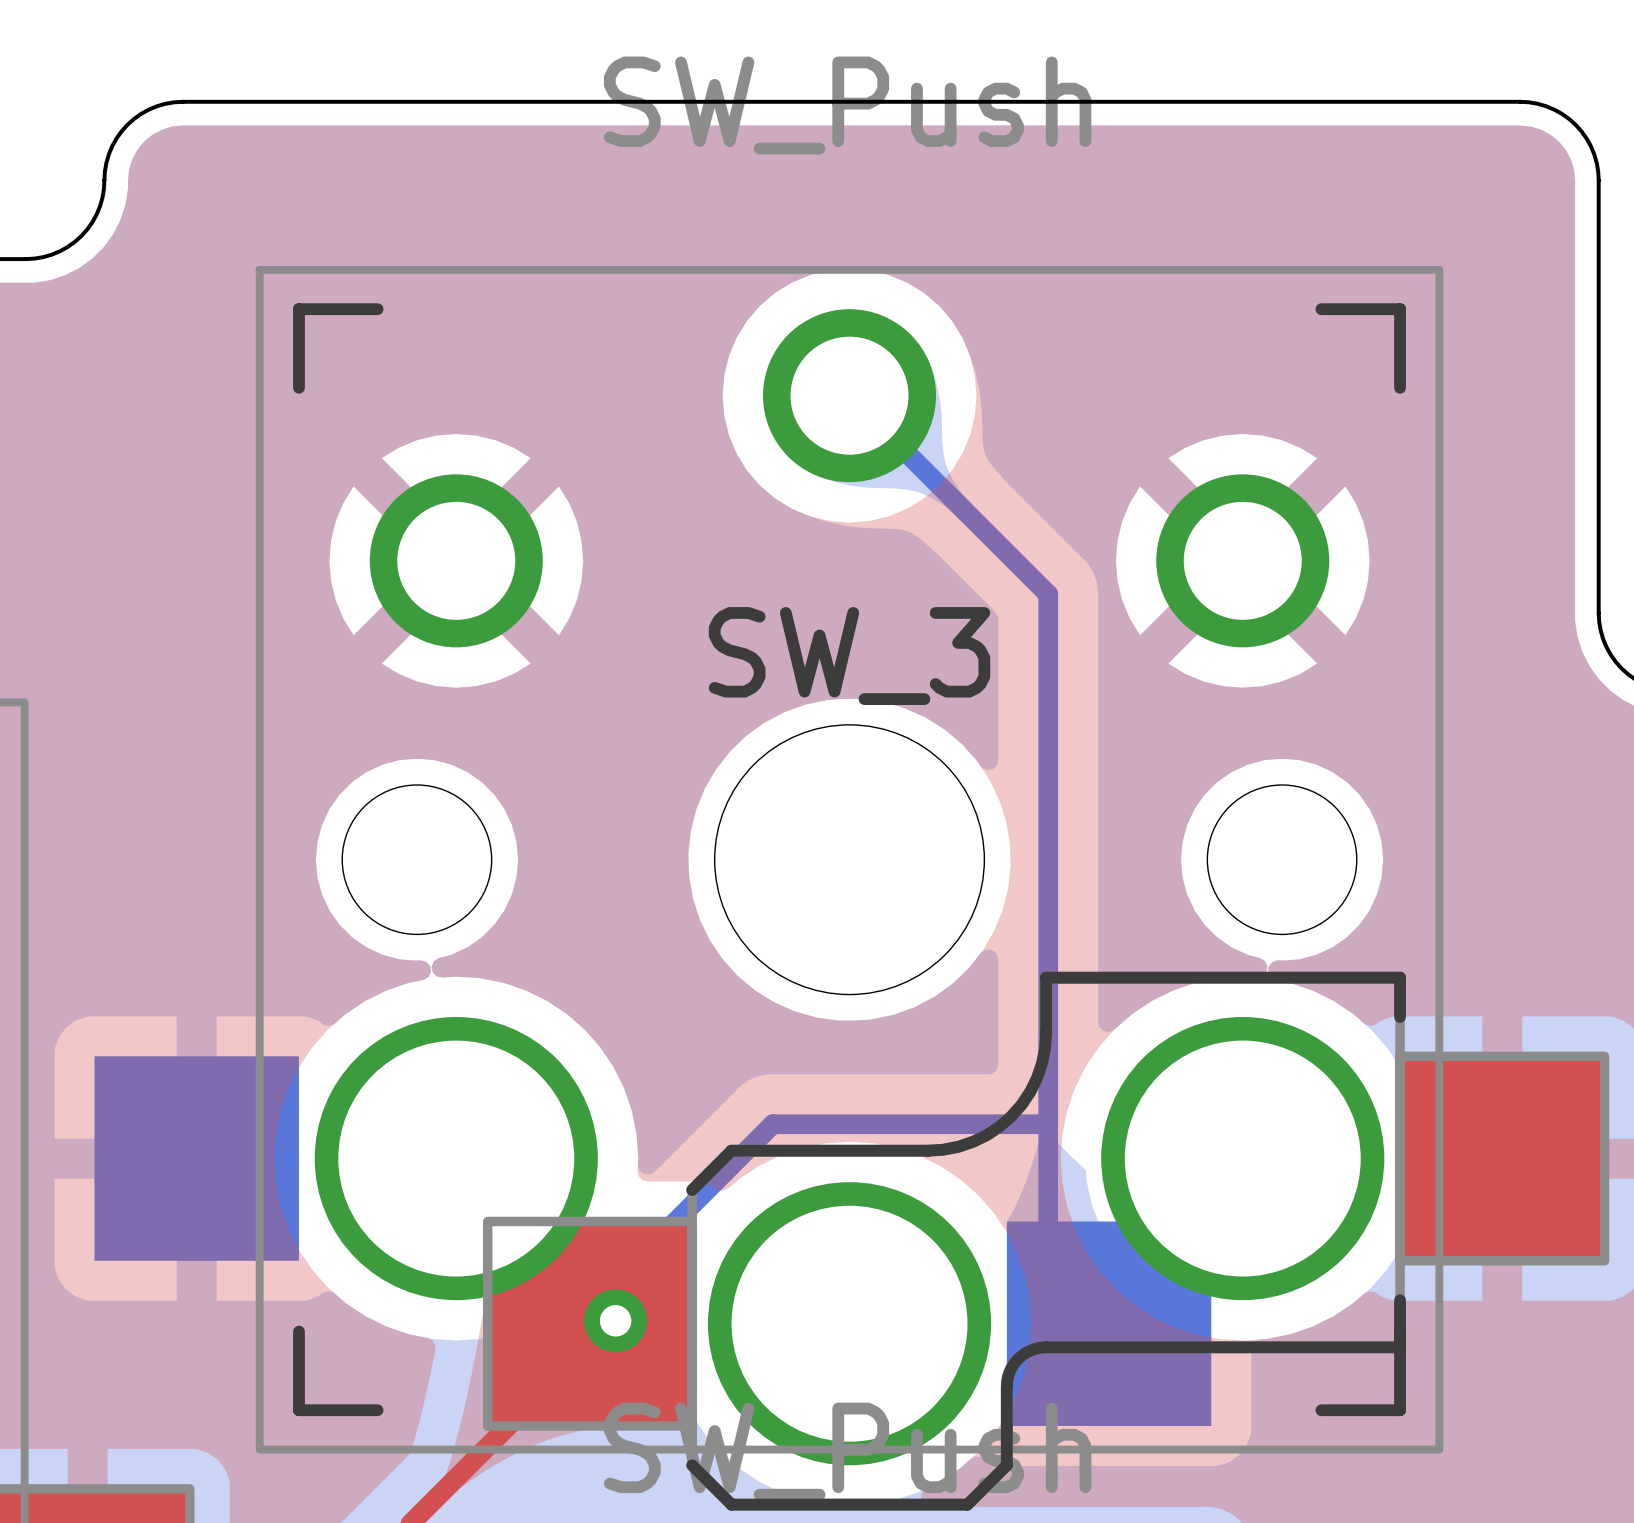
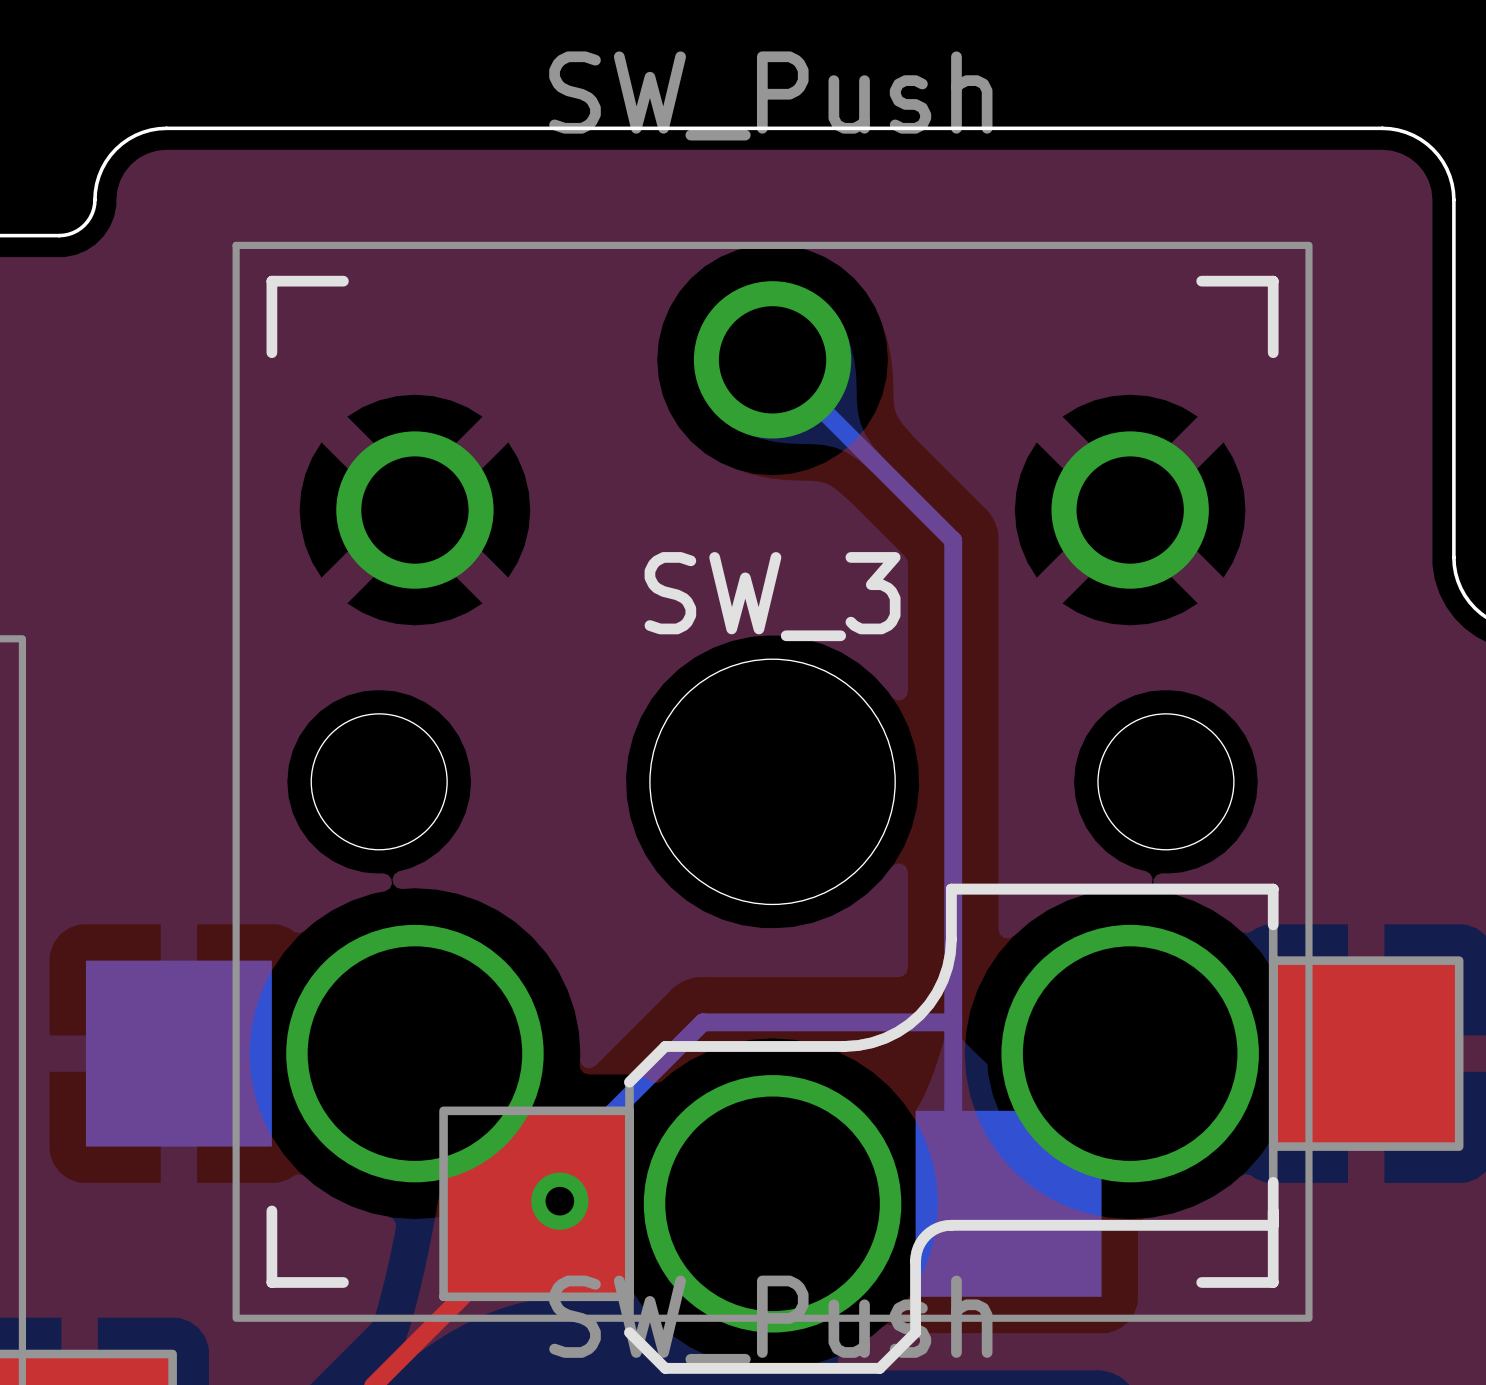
board edge: (1598, 219) (1598, 171) (1594, 154) (1586, 138) (1575, 124) (1561, 113) (1546, 106) (1528, 102) (183, 101) (157, 106) (141, 113) (127, 124) (116, 138) (108, 154) (102, 197) (96, 214) (87, 229) (74, 241) (59, 251) (43, 257) (25, 259) -> (1453, 199) (1452, 183) (1446, 168) (1432, 149) (1420, 139) (1405, 132) (1382, 128) (166, 128) (150, 130) (135, 135) (121, 143) (110, 155) (98, 176) (92, 213) (80, 228) (63, 235) (23, 235)

